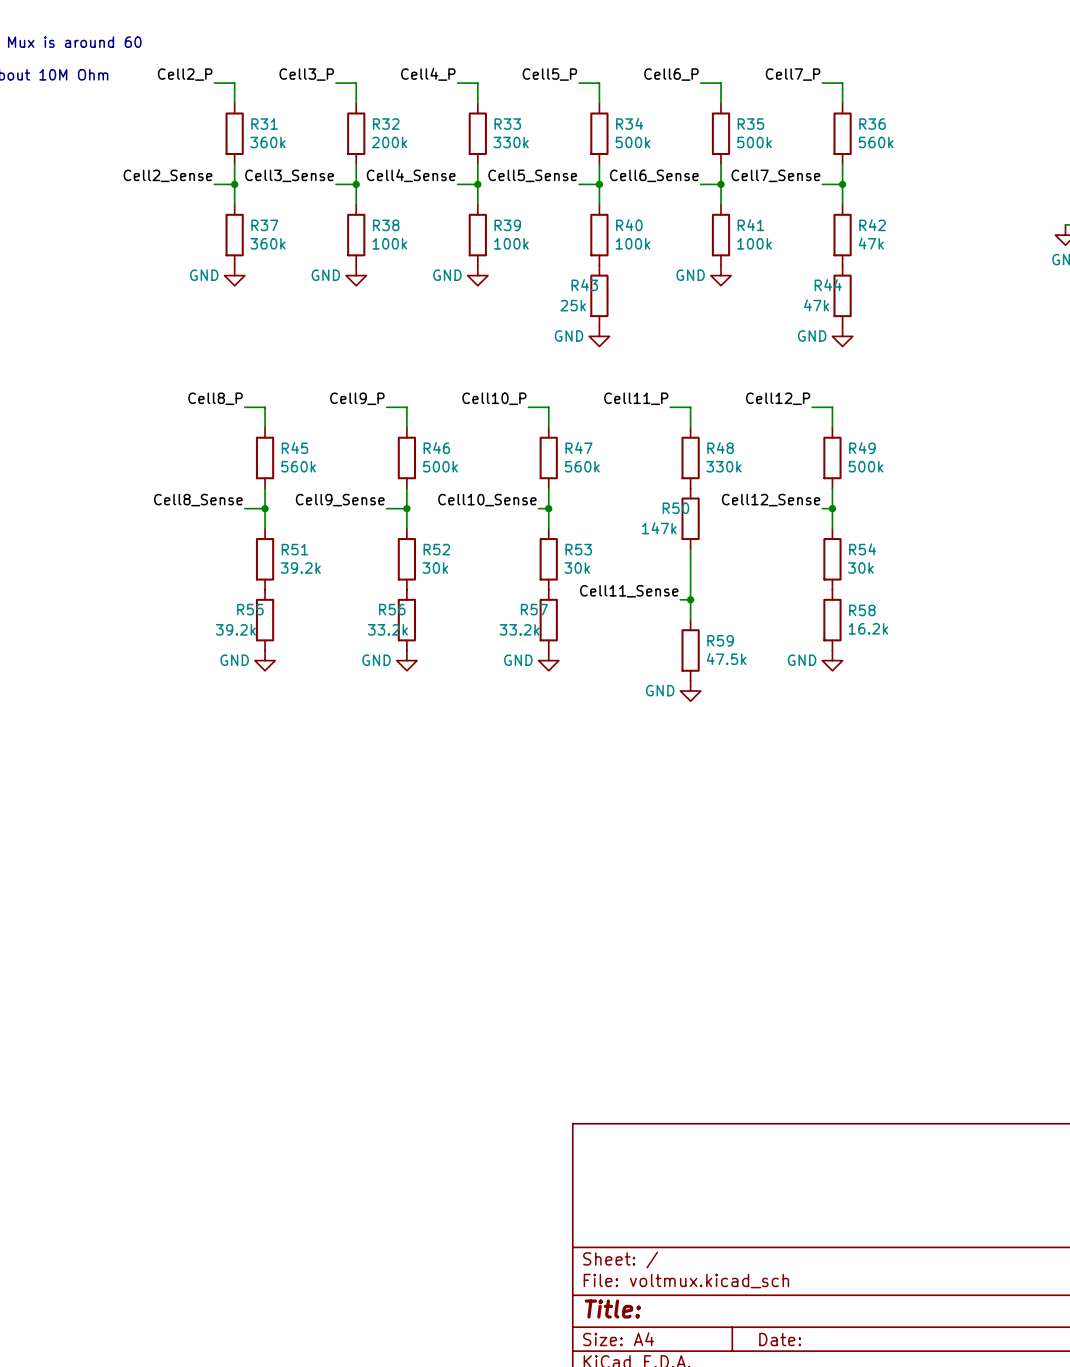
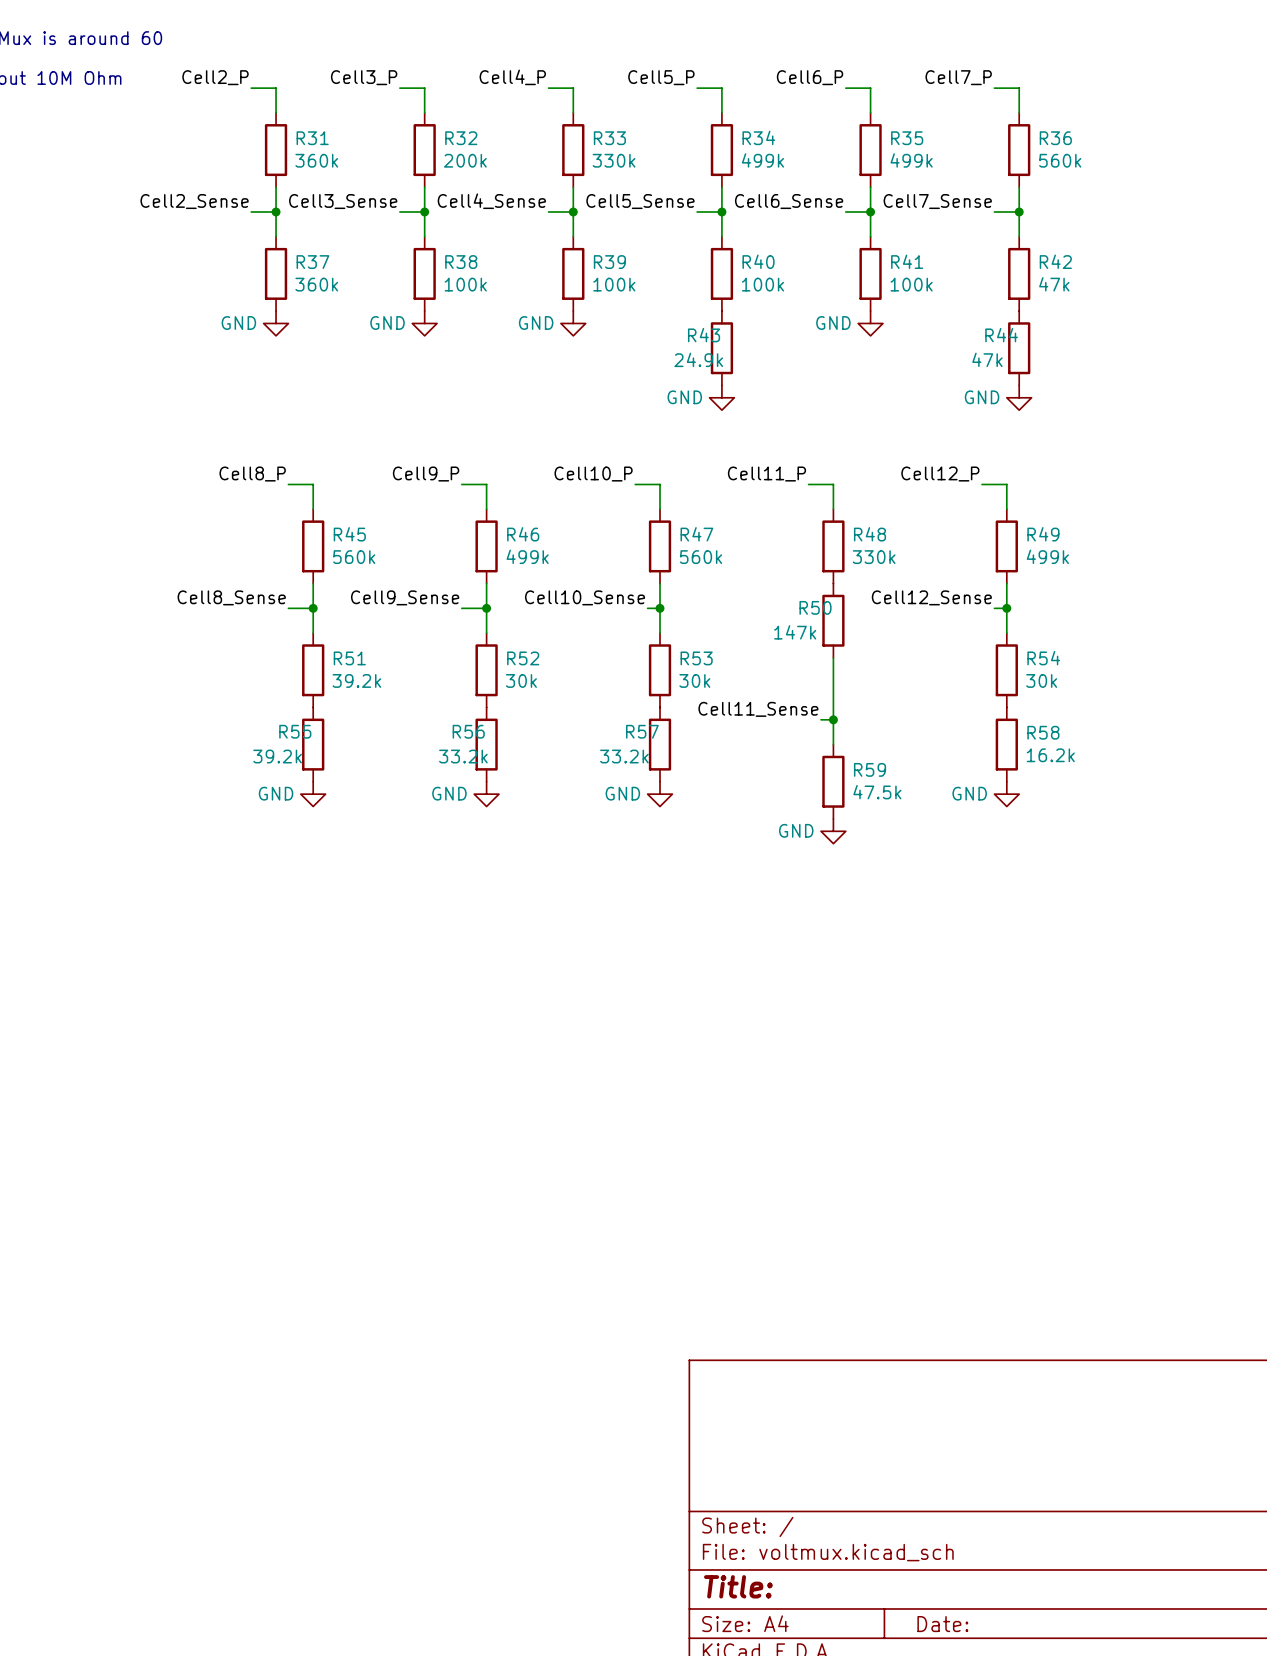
R34 value: 500k (632, 142) -> 499k (762, 160)
R35 value: 500k (754, 142) -> 499k (911, 160)
R43 value: 25k (573, 305) -> 24.9k (698, 359)
R46 value: 500k (440, 466) -> 499k (527, 556)
R49 value: 500k (866, 466) -> 499k (1047, 556)

